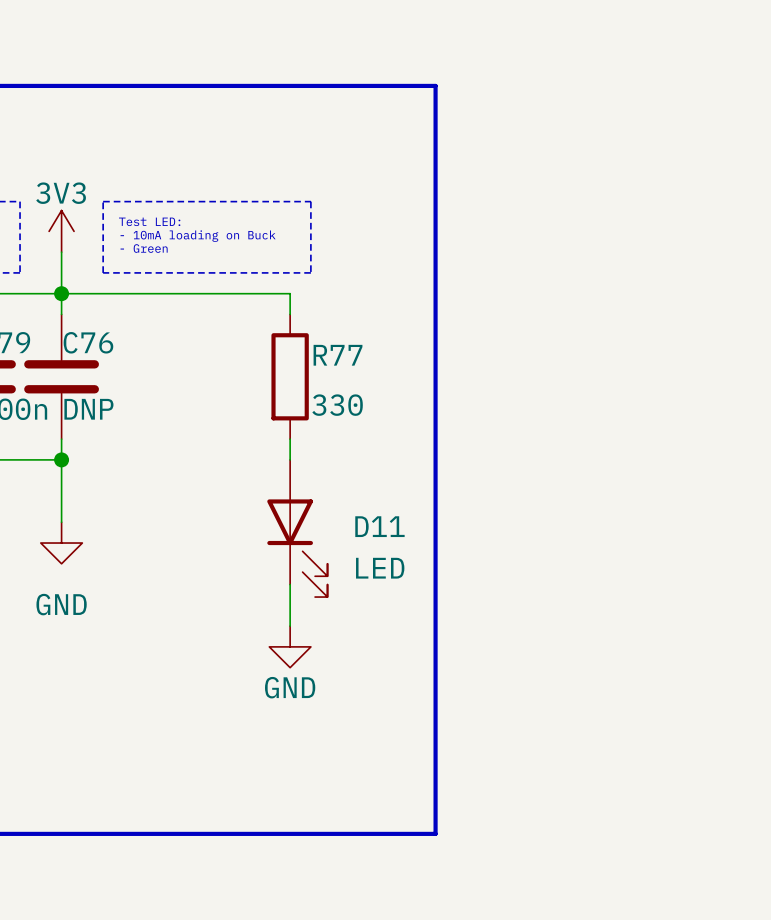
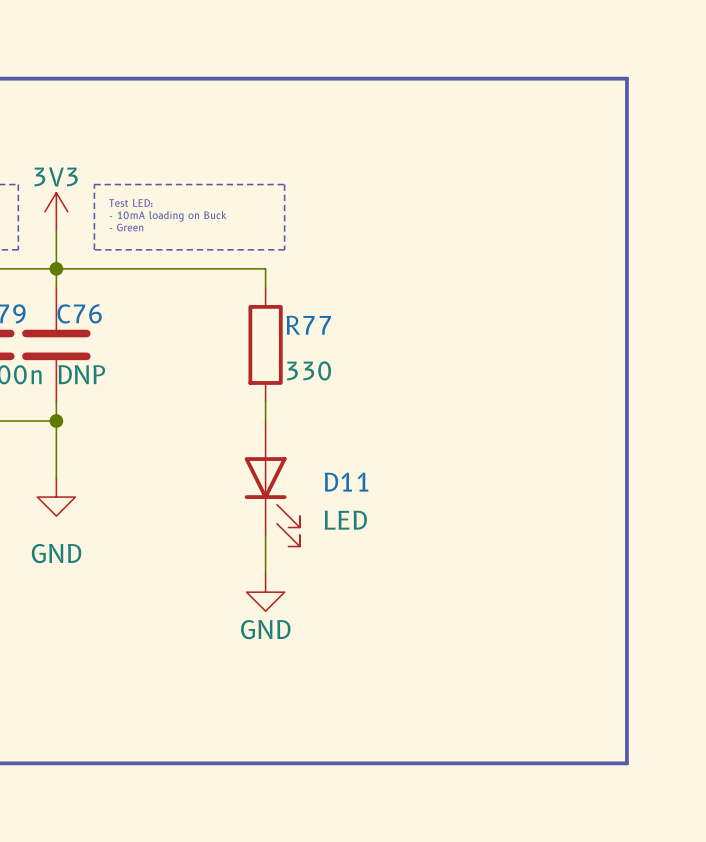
line: (435, 85) (435, 833) -> (398, 78) (626, 78) (626, 763) (398, 763)

